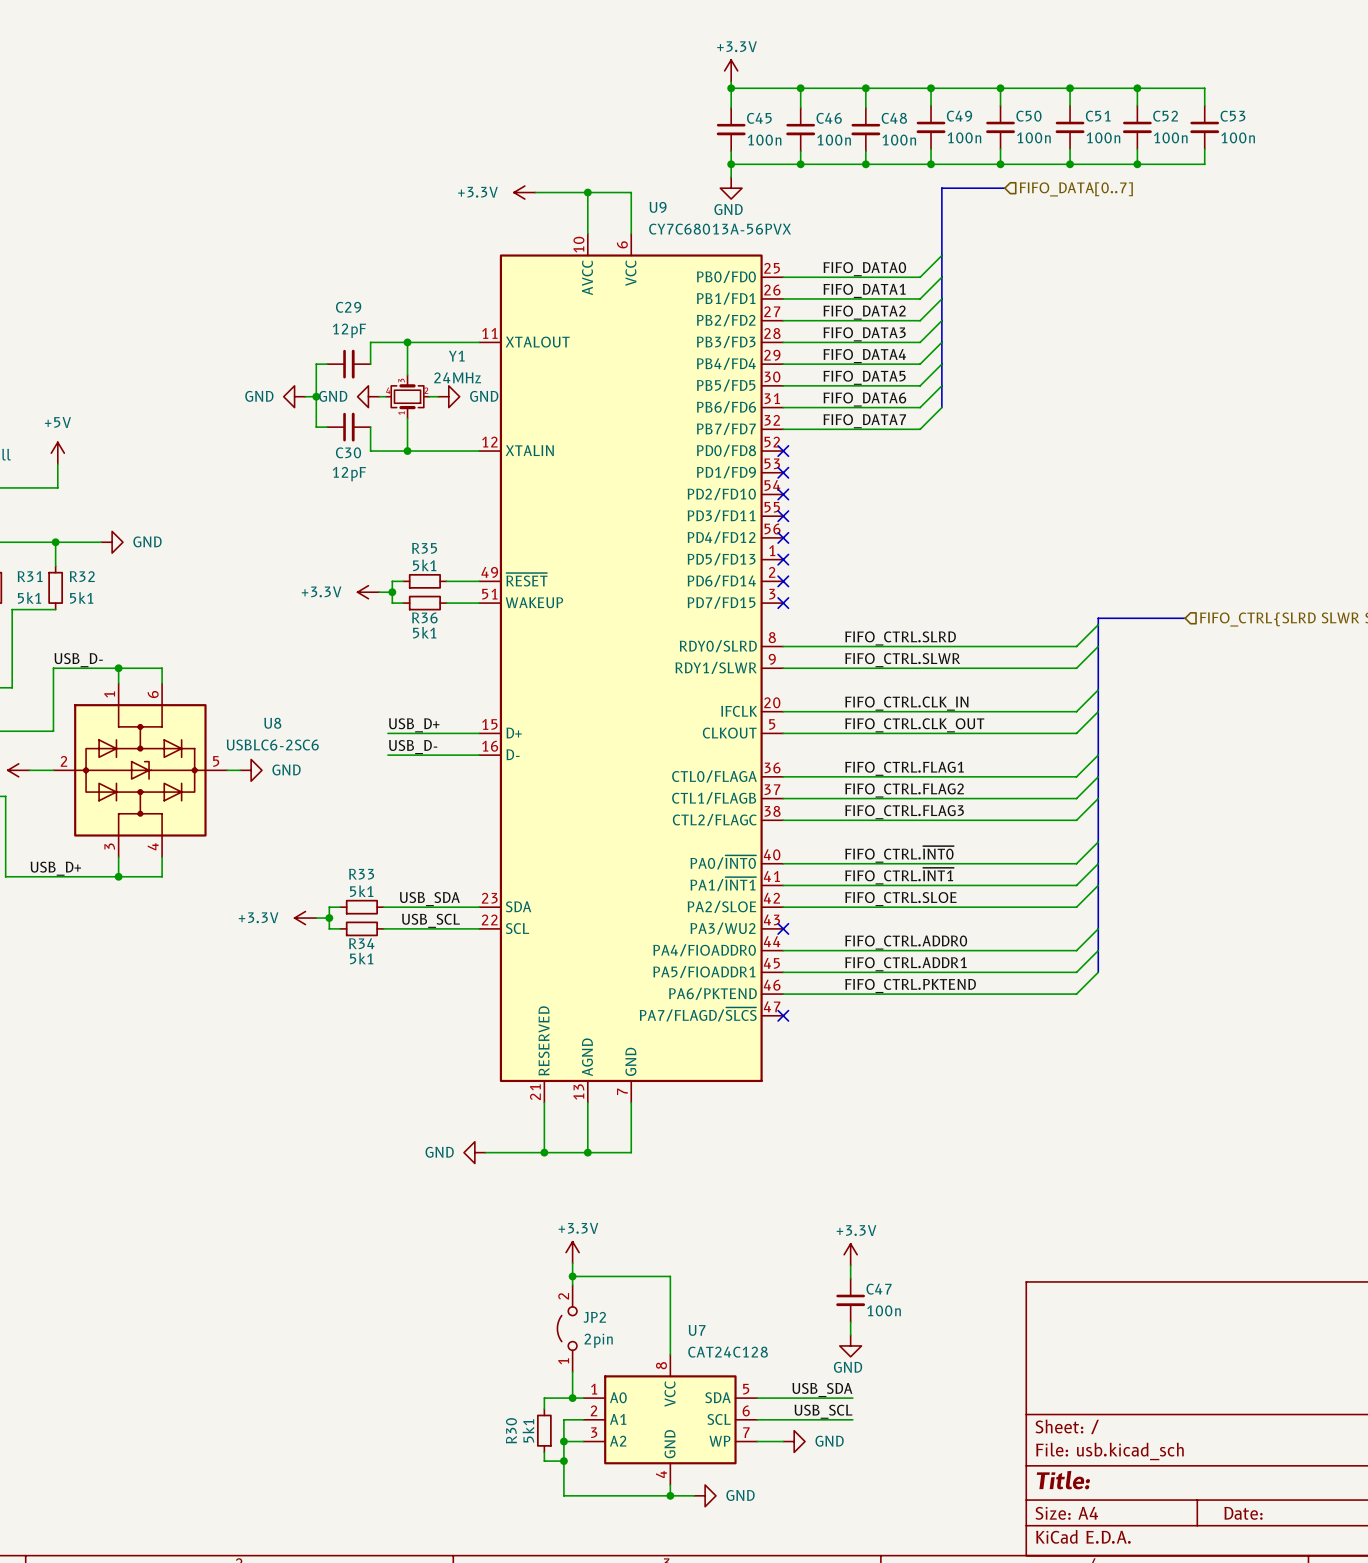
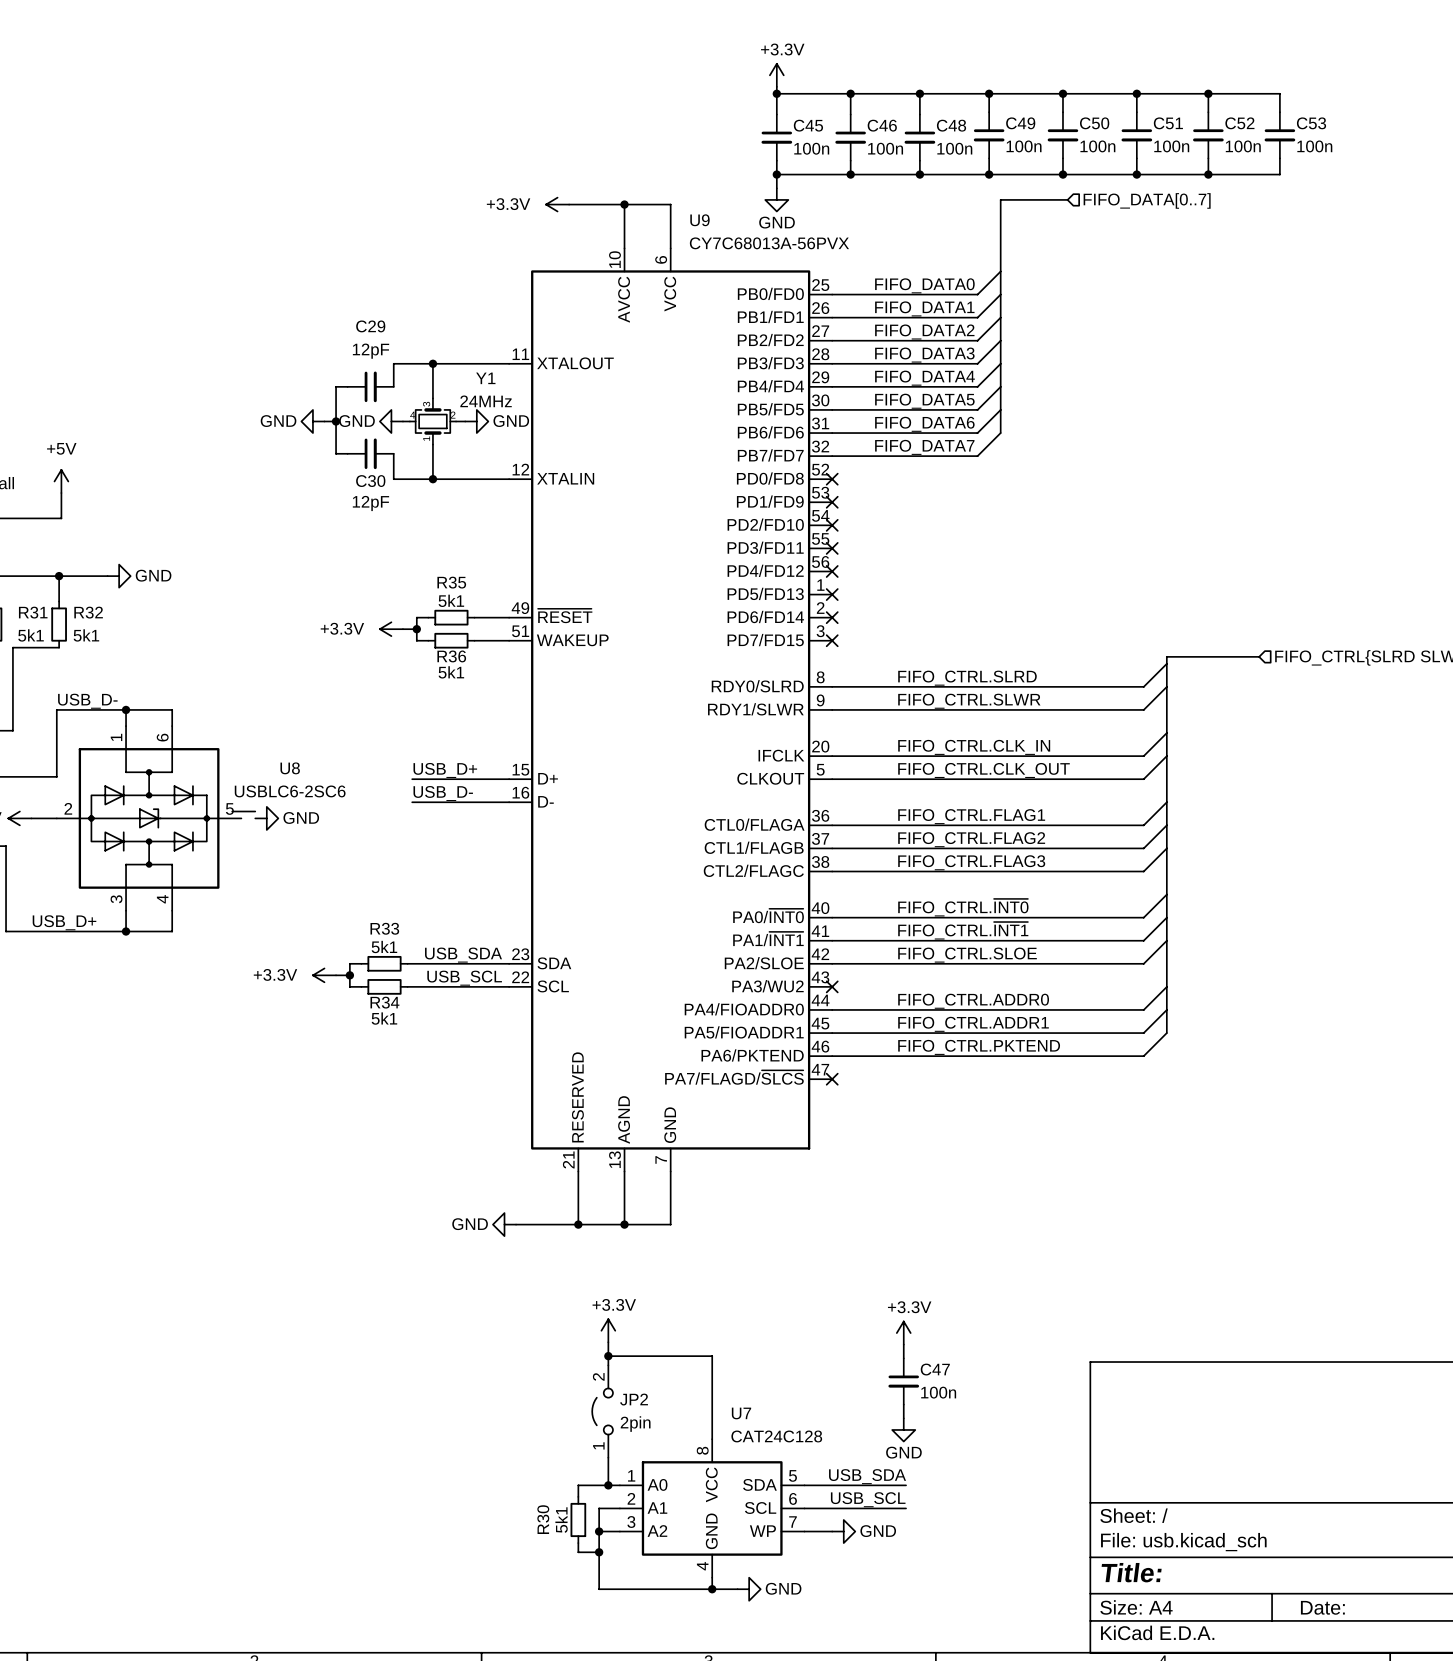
wire: none -> (232, 811) (255, 811)
wire: (227, 770) (240, 770) -> none

